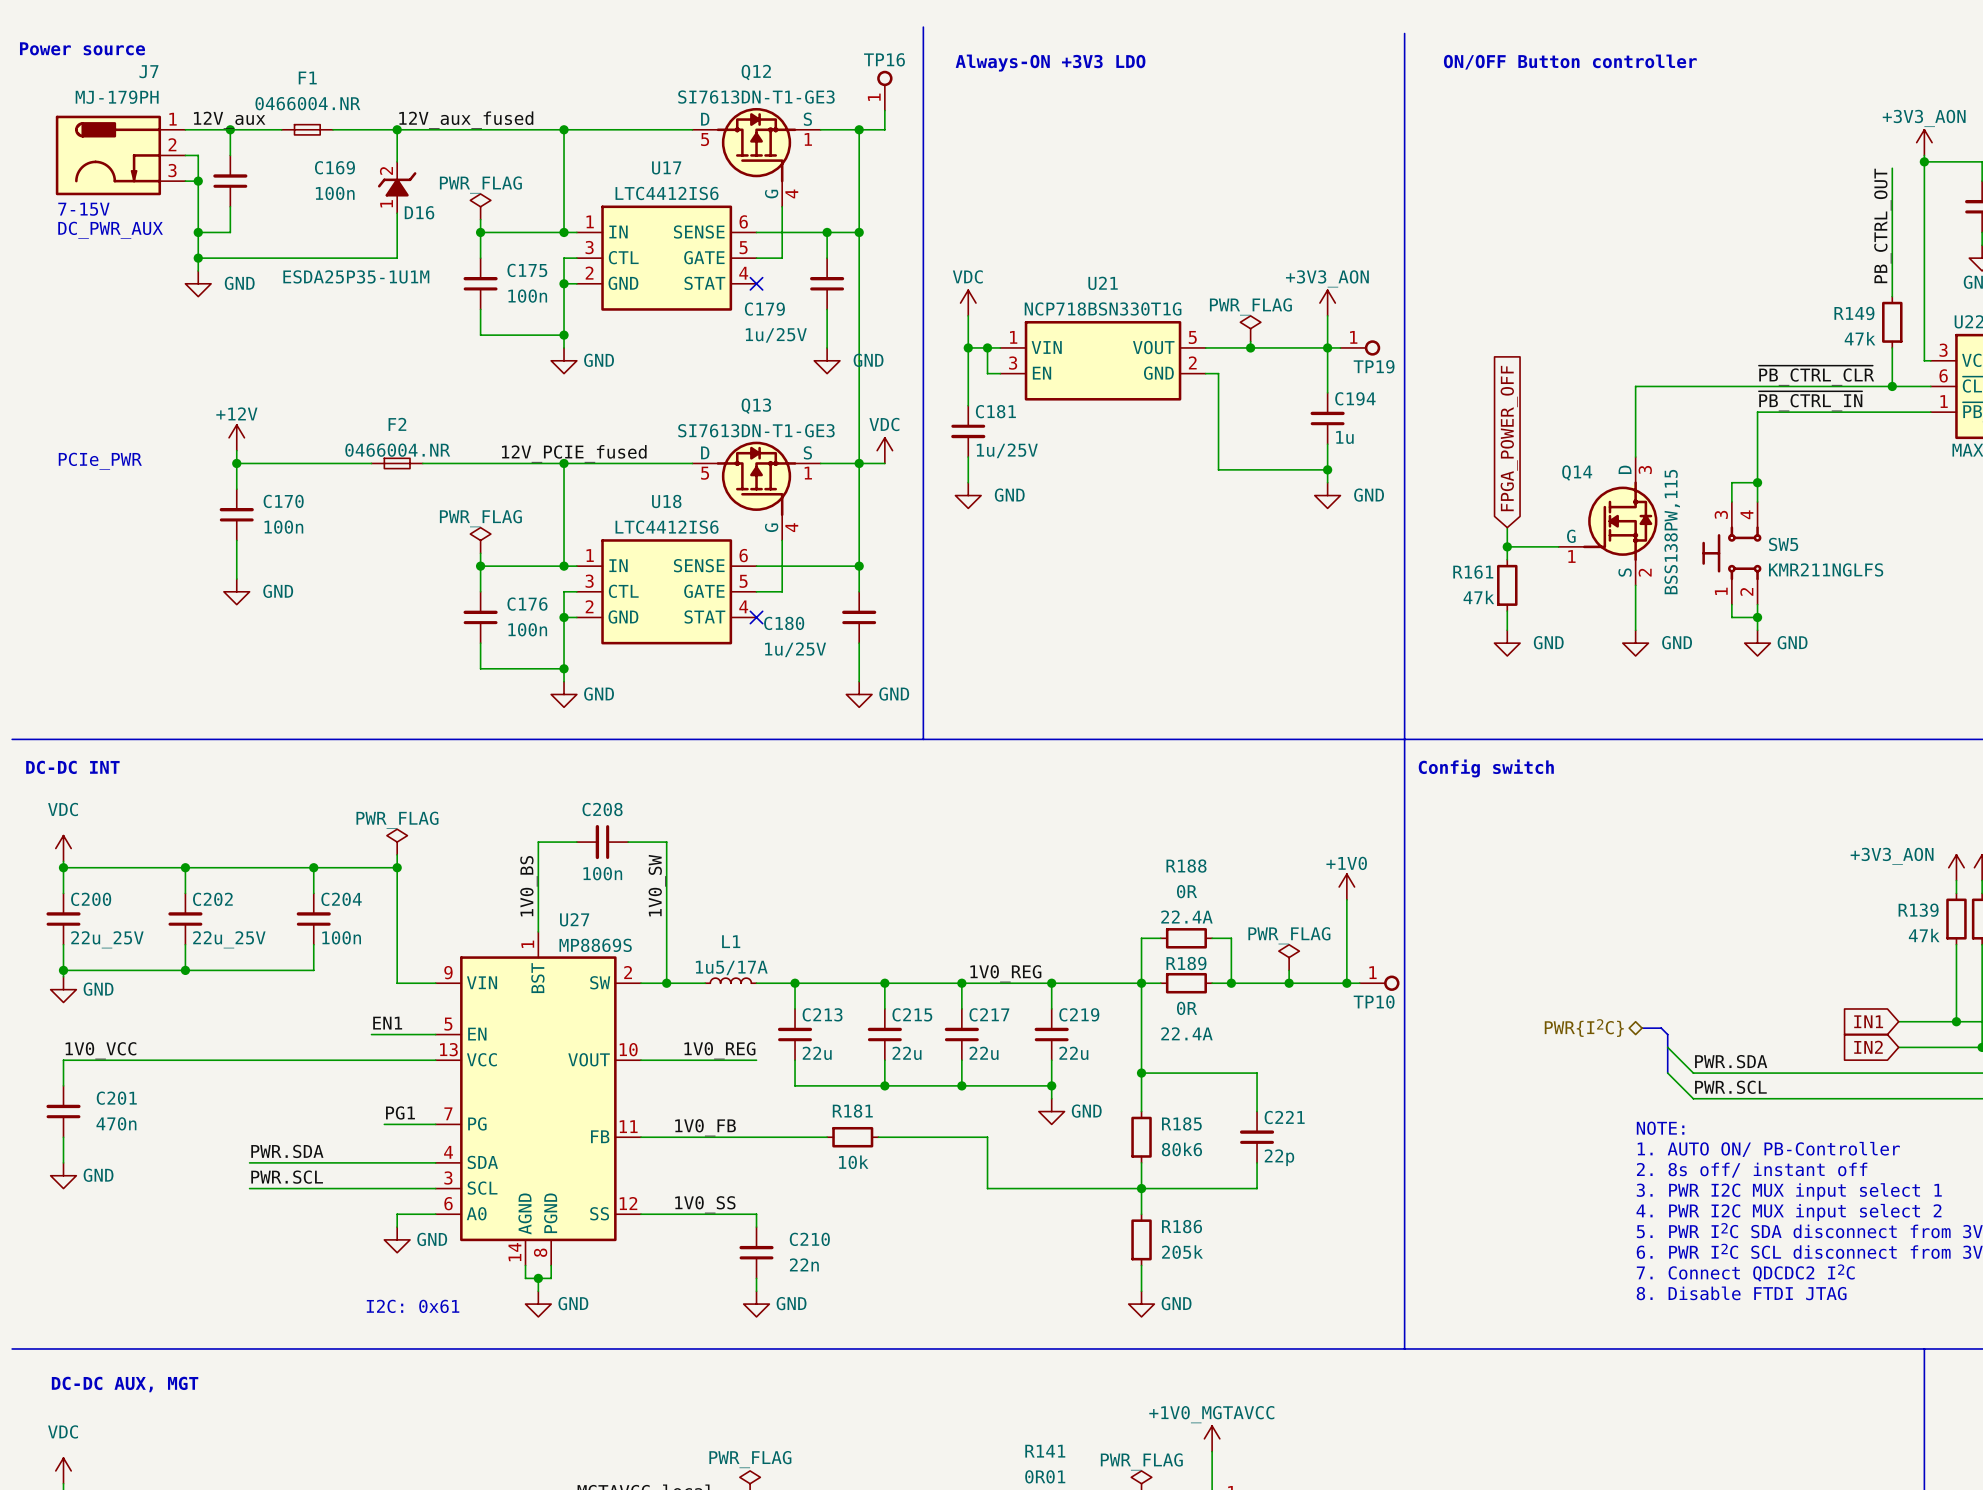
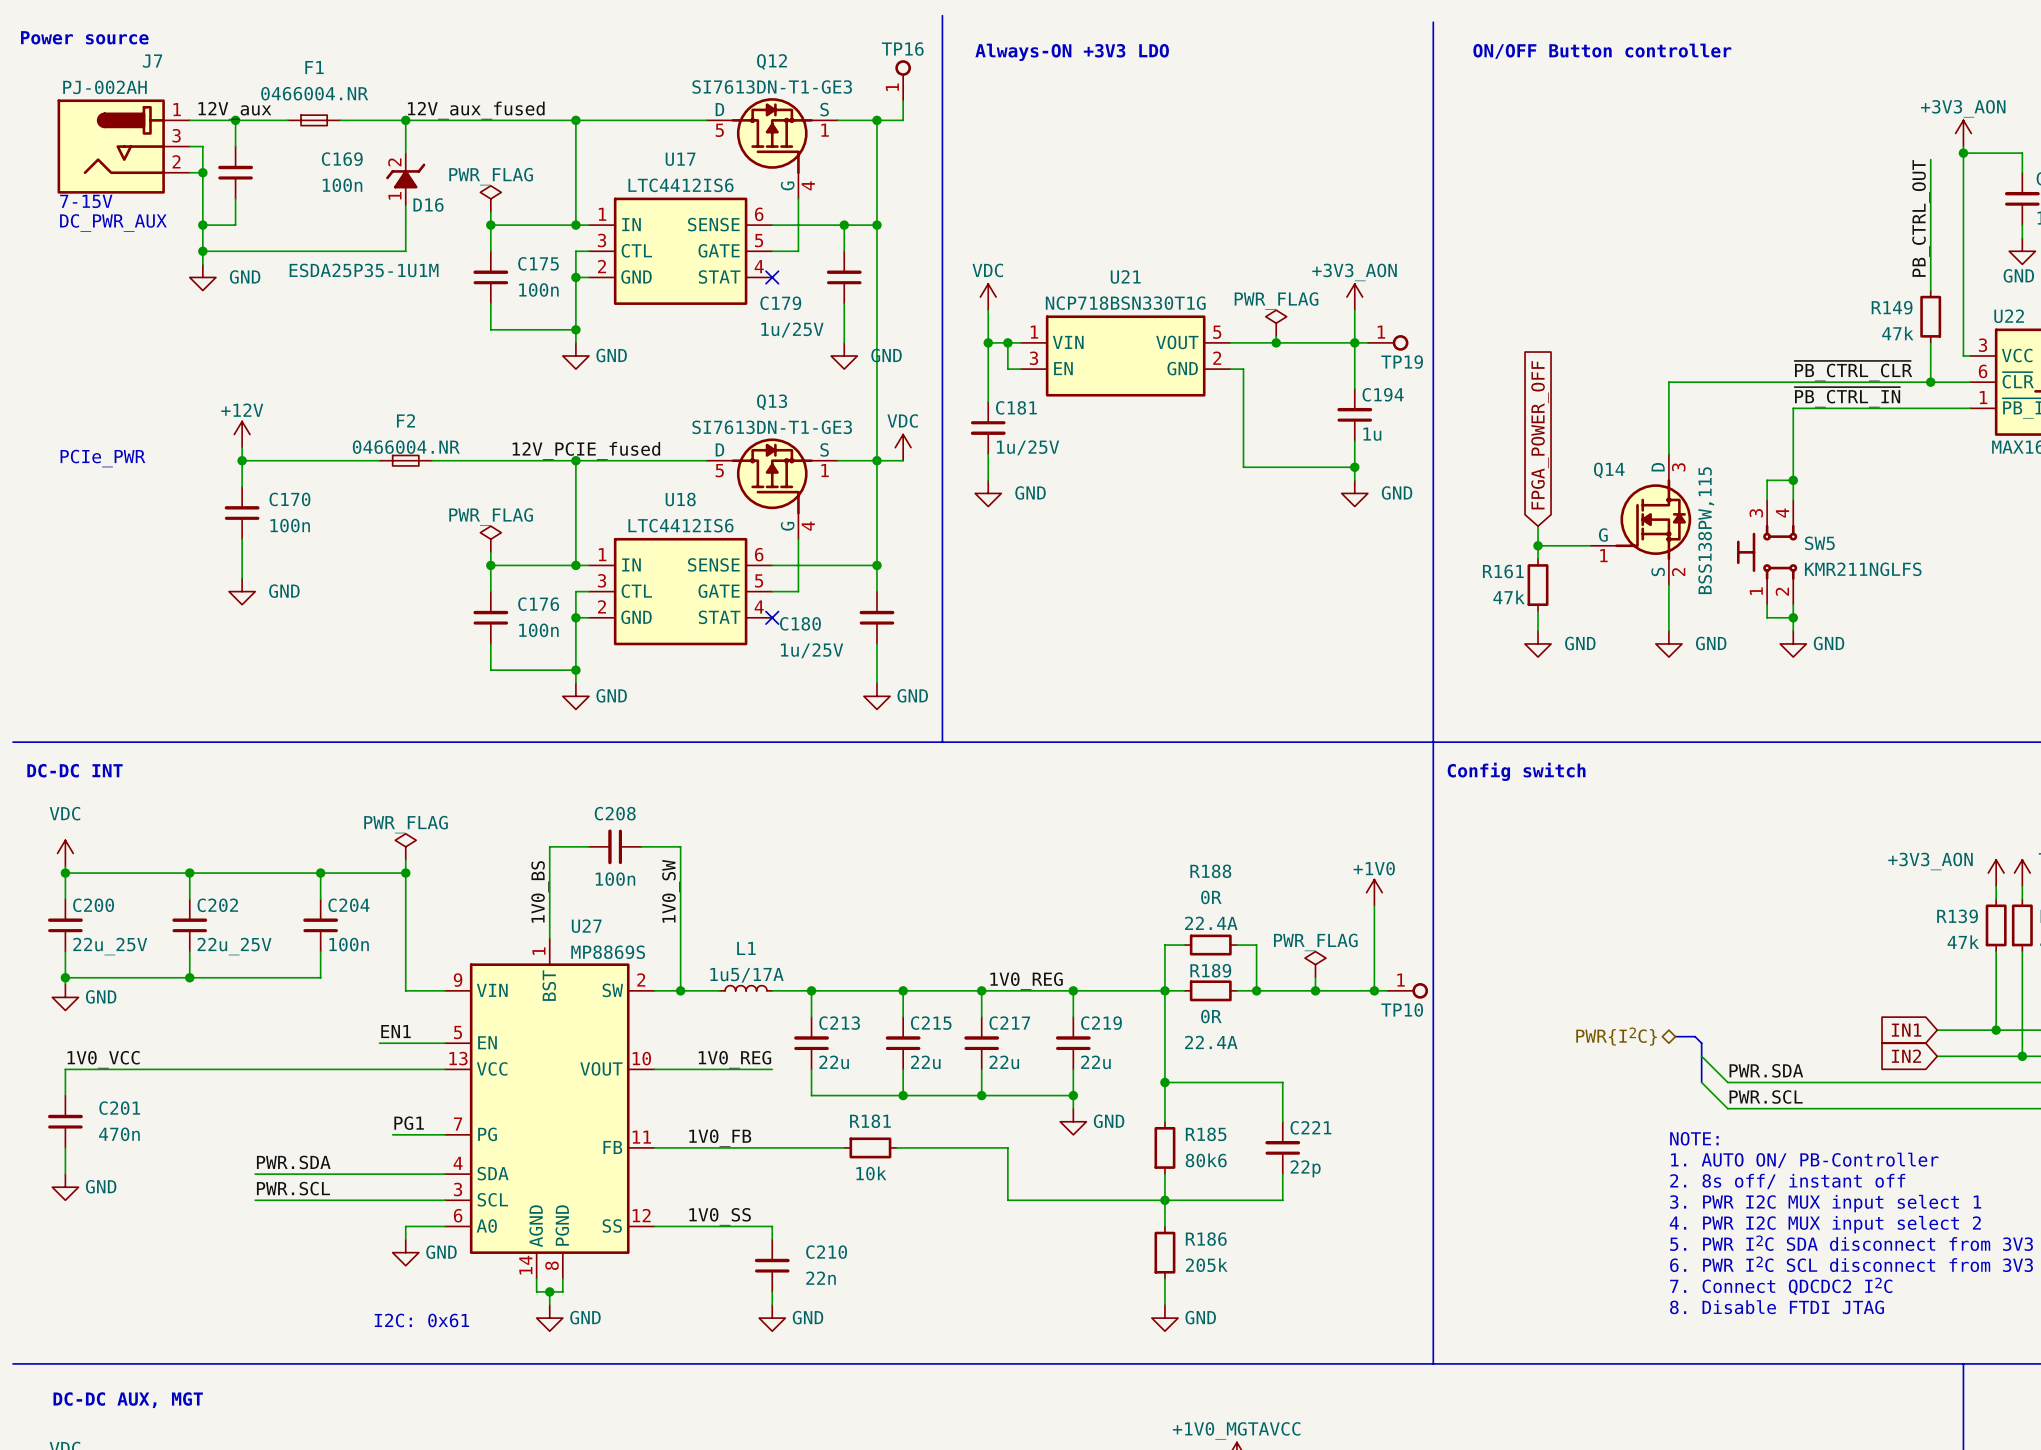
J7 text: MJ-179PH (117, 97) -> PJ-002AH (104, 87)
J7 symbol: [55, 115, 186, 196] -> [57, 99, 190, 194]

